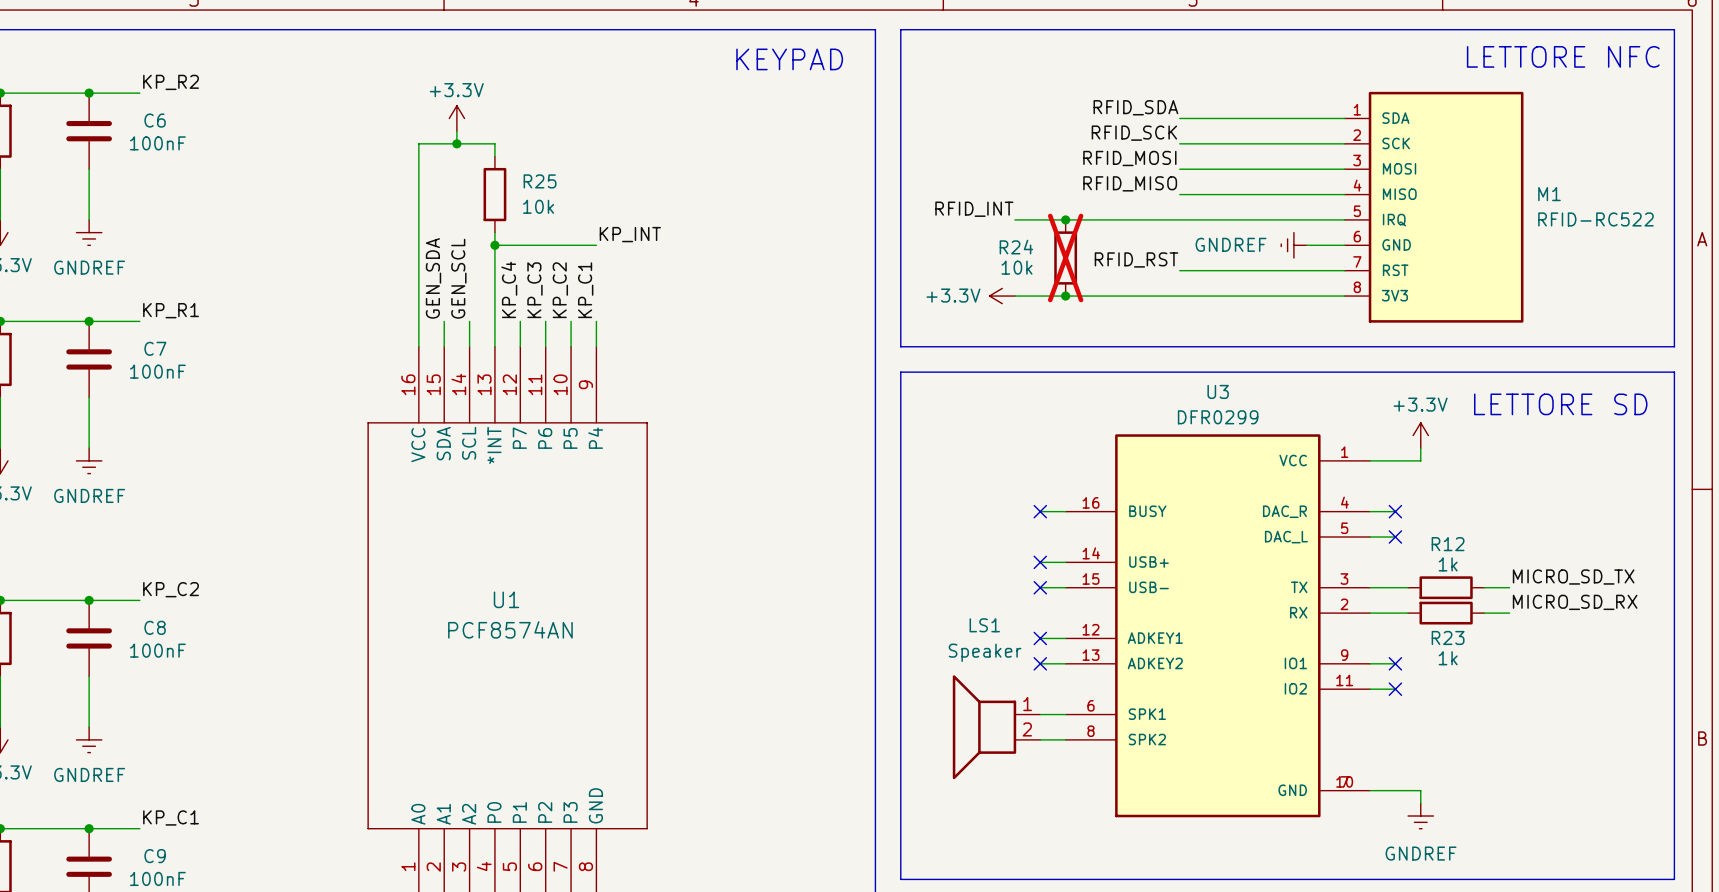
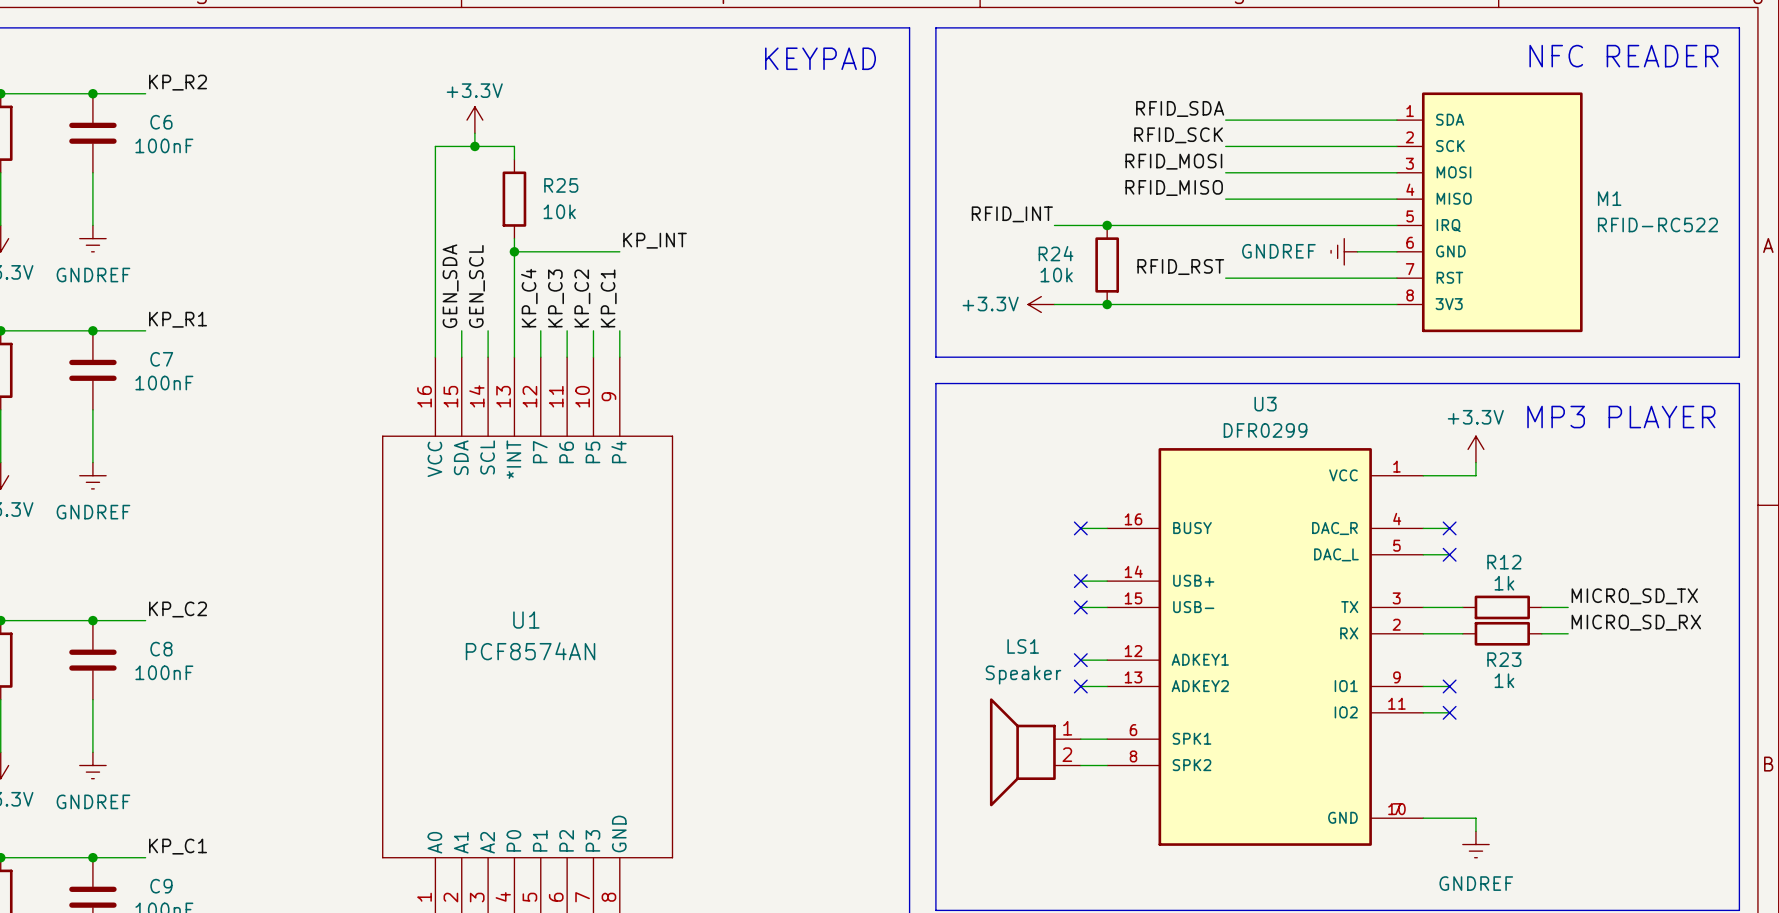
text: LETTORE NFC (1563, 56) -> NFC READER (1623, 56)
R24 do-not-place cross: (1065, 257) -> none
text: LETTORE SD (1560, 404) -> MP3 PLAYER (1621, 417)

